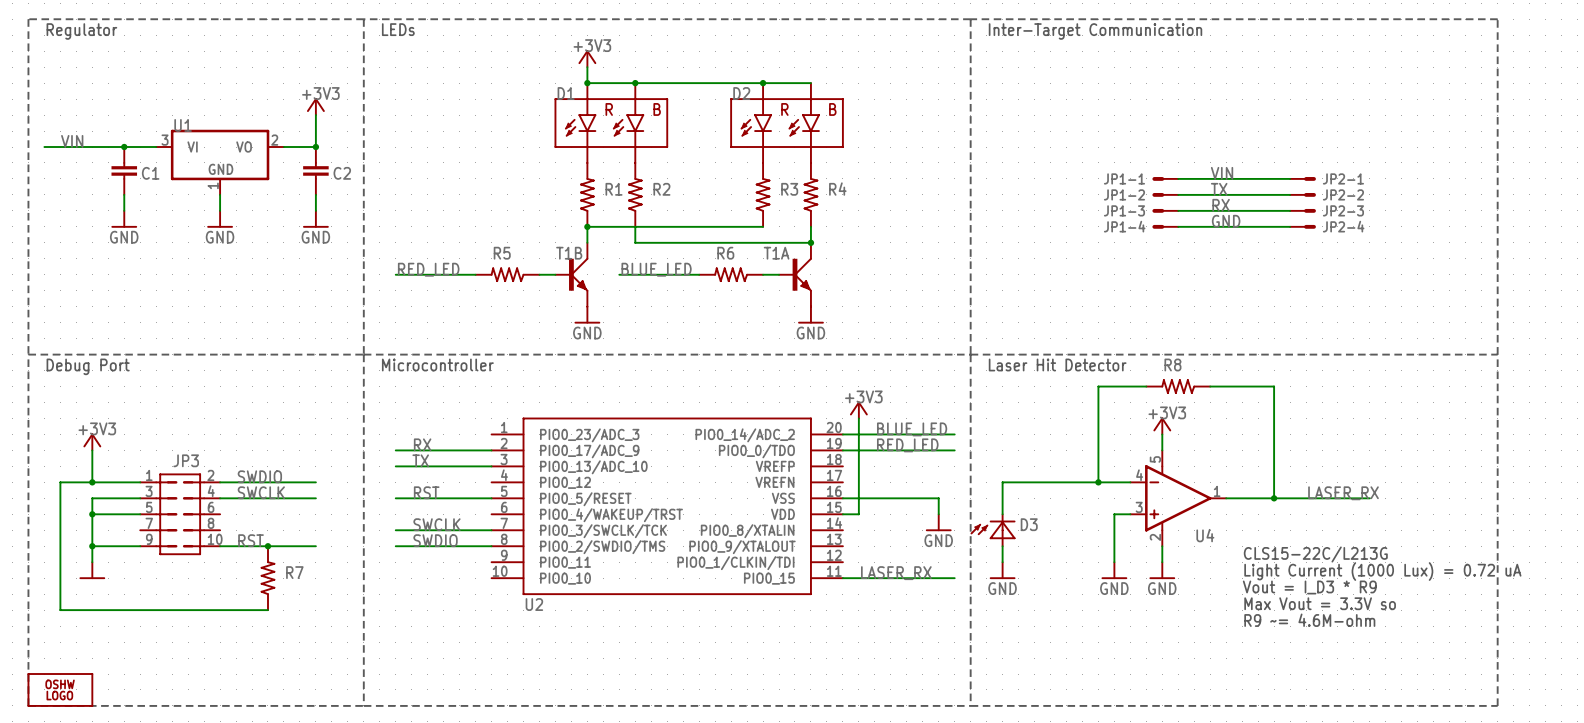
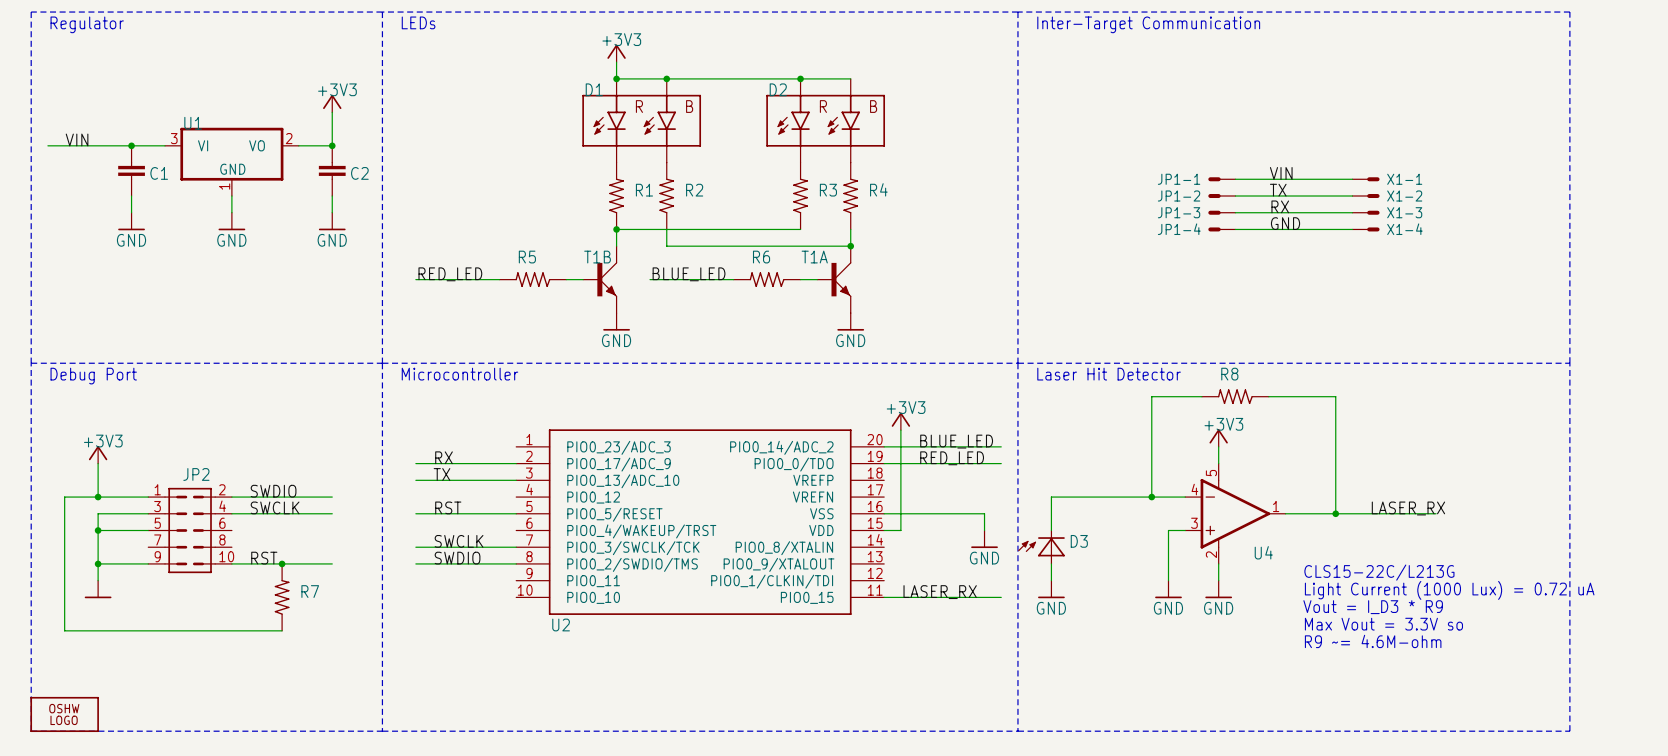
JP2-1 name: JP2-1 (1343, 178) -> X1-1 (1404, 179)
JP2-2 name: JP2-2 (1343, 194) -> X1-2 (1404, 196)
JP2-3 name: JP2-3 (1343, 210) -> X1-3 (1404, 212)
JP2-4 name: JP2-4 (1343, 226) -> X1-4 (1404, 229)
JP3 name: JP3 (186, 460) -> JP2 (196, 474)

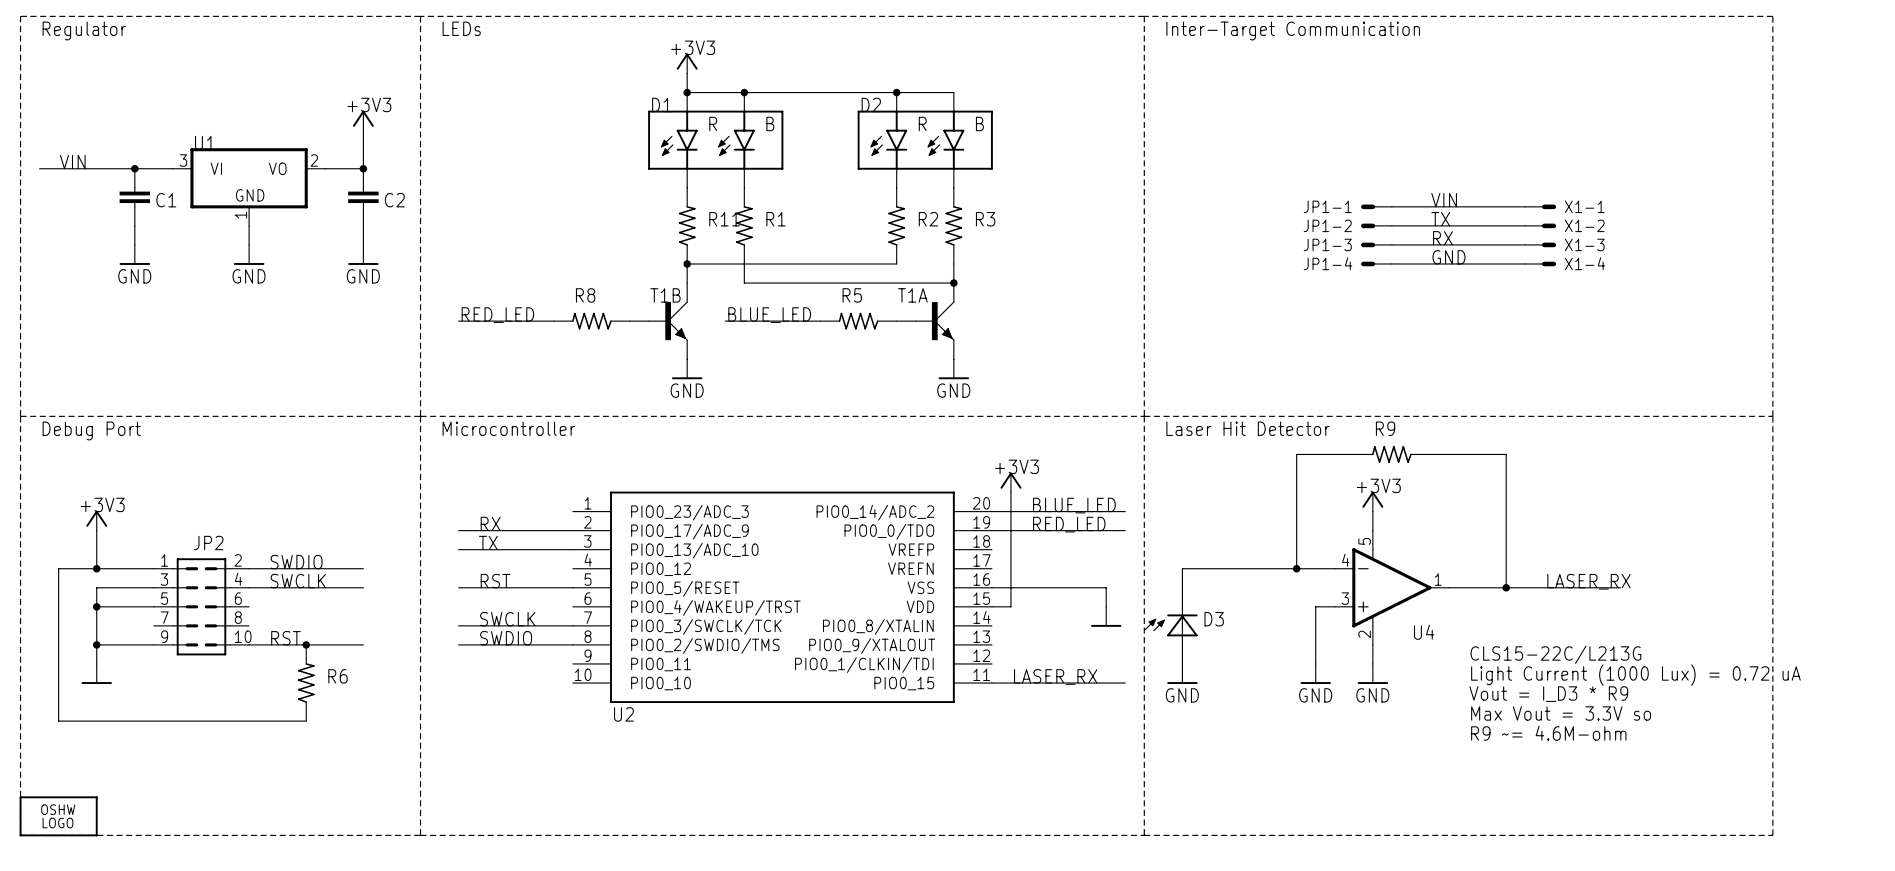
R4 name: R4 (878, 189) -> R3 (985, 219)
R1 name: R1 (644, 190) -> R11 (724, 219)
R2 name: R2 (694, 190) -> R1 (776, 219)
R3 name: R3 (828, 190) -> R2 (928, 219)
R5 name: R5 (527, 257) -> R8 (585, 295)
R6 name: R6 (761, 257) -> R5 (852, 295)
R8 name: R8 (1229, 374) -> R9 (1385, 428)
power symbol text: GND (984, 558) -> none
R7 name: R7 (310, 591) -> R6 (337, 676)

